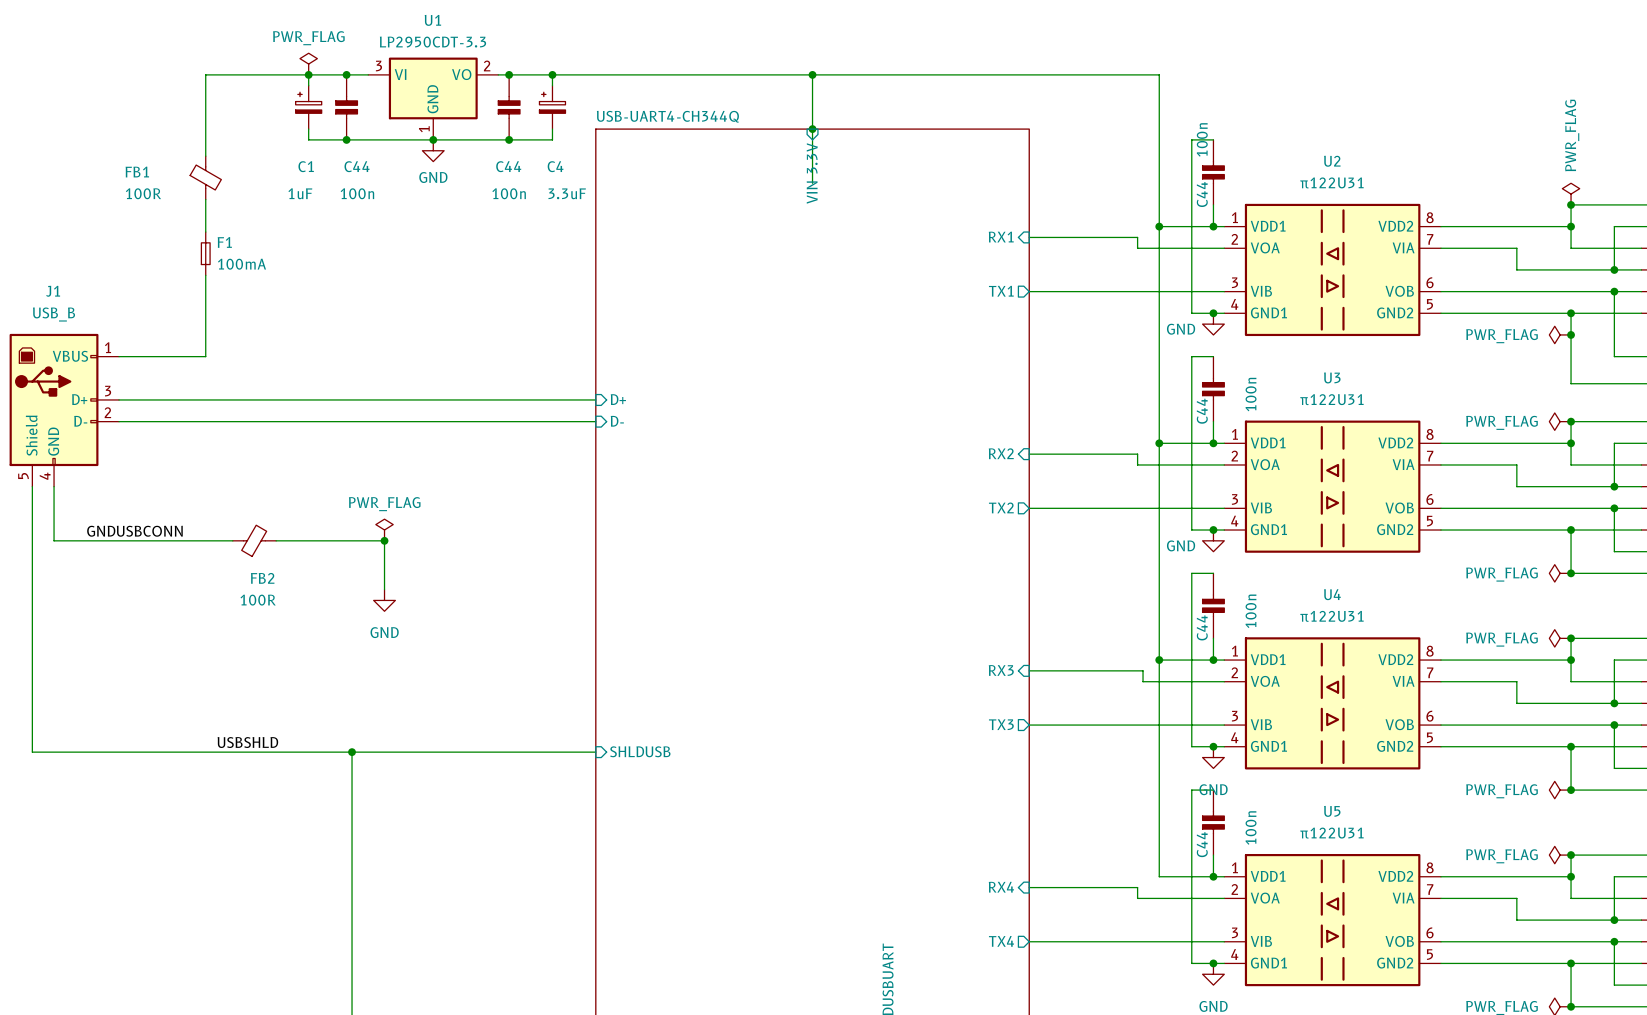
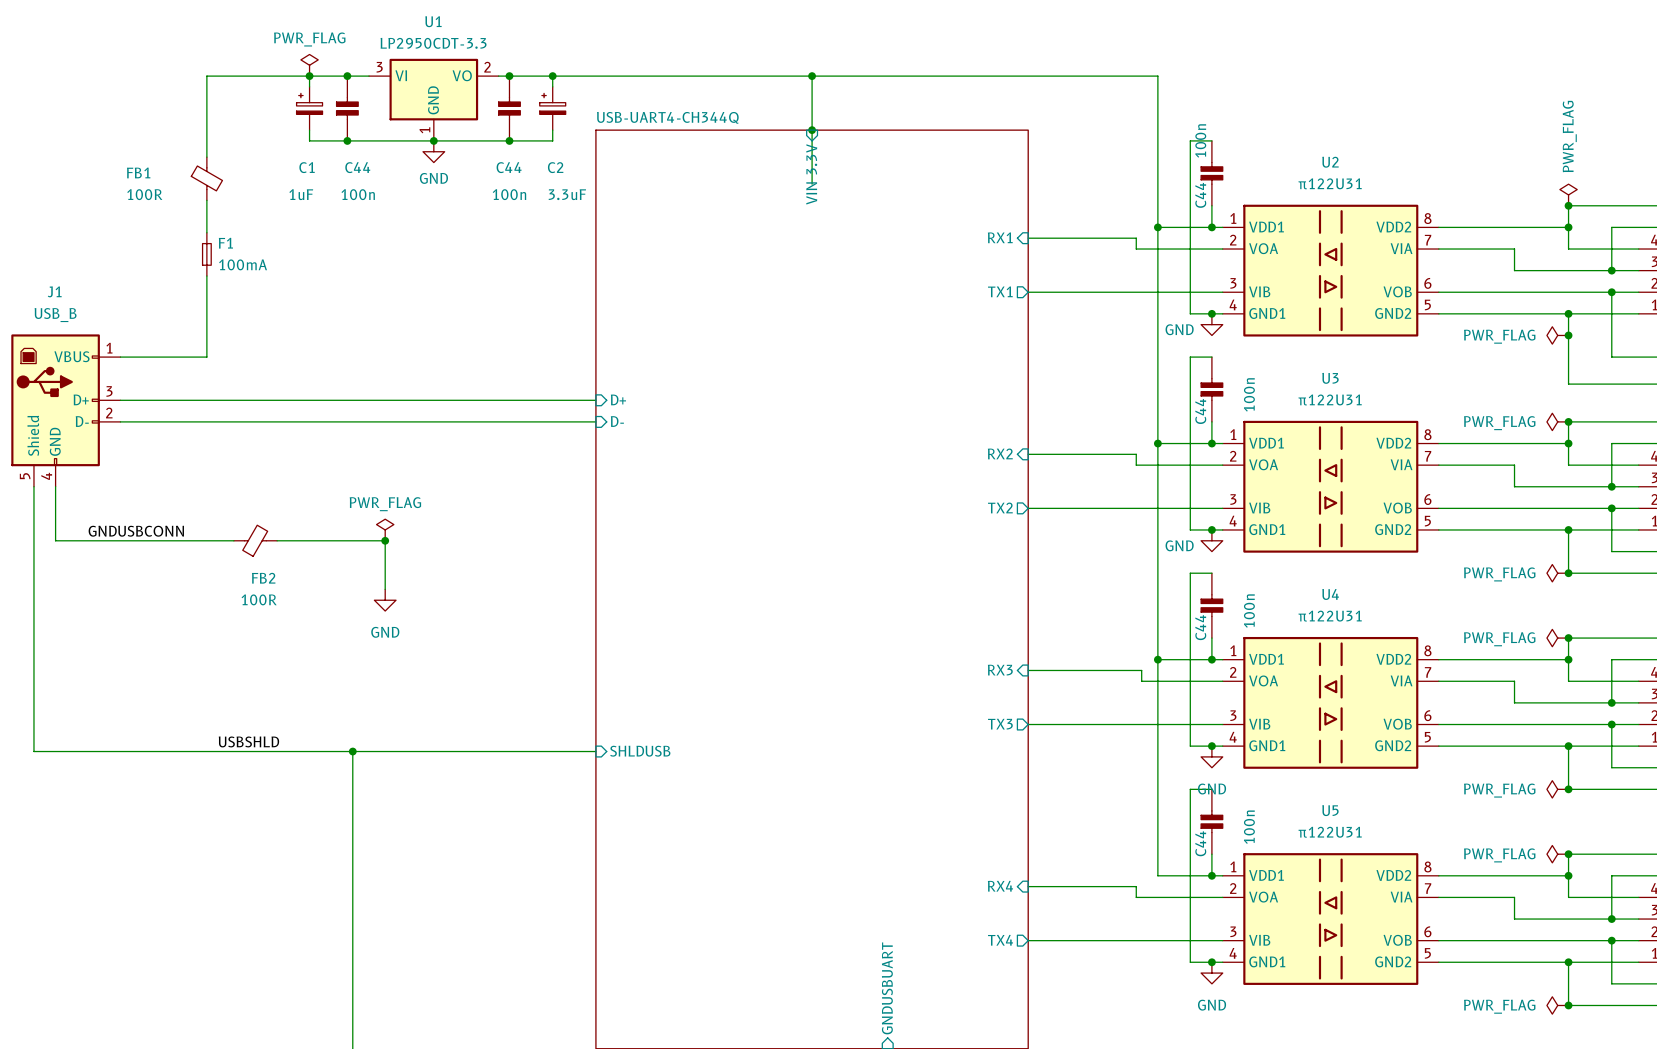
C4 name: C4 (555, 166) -> C2 (555, 167)

